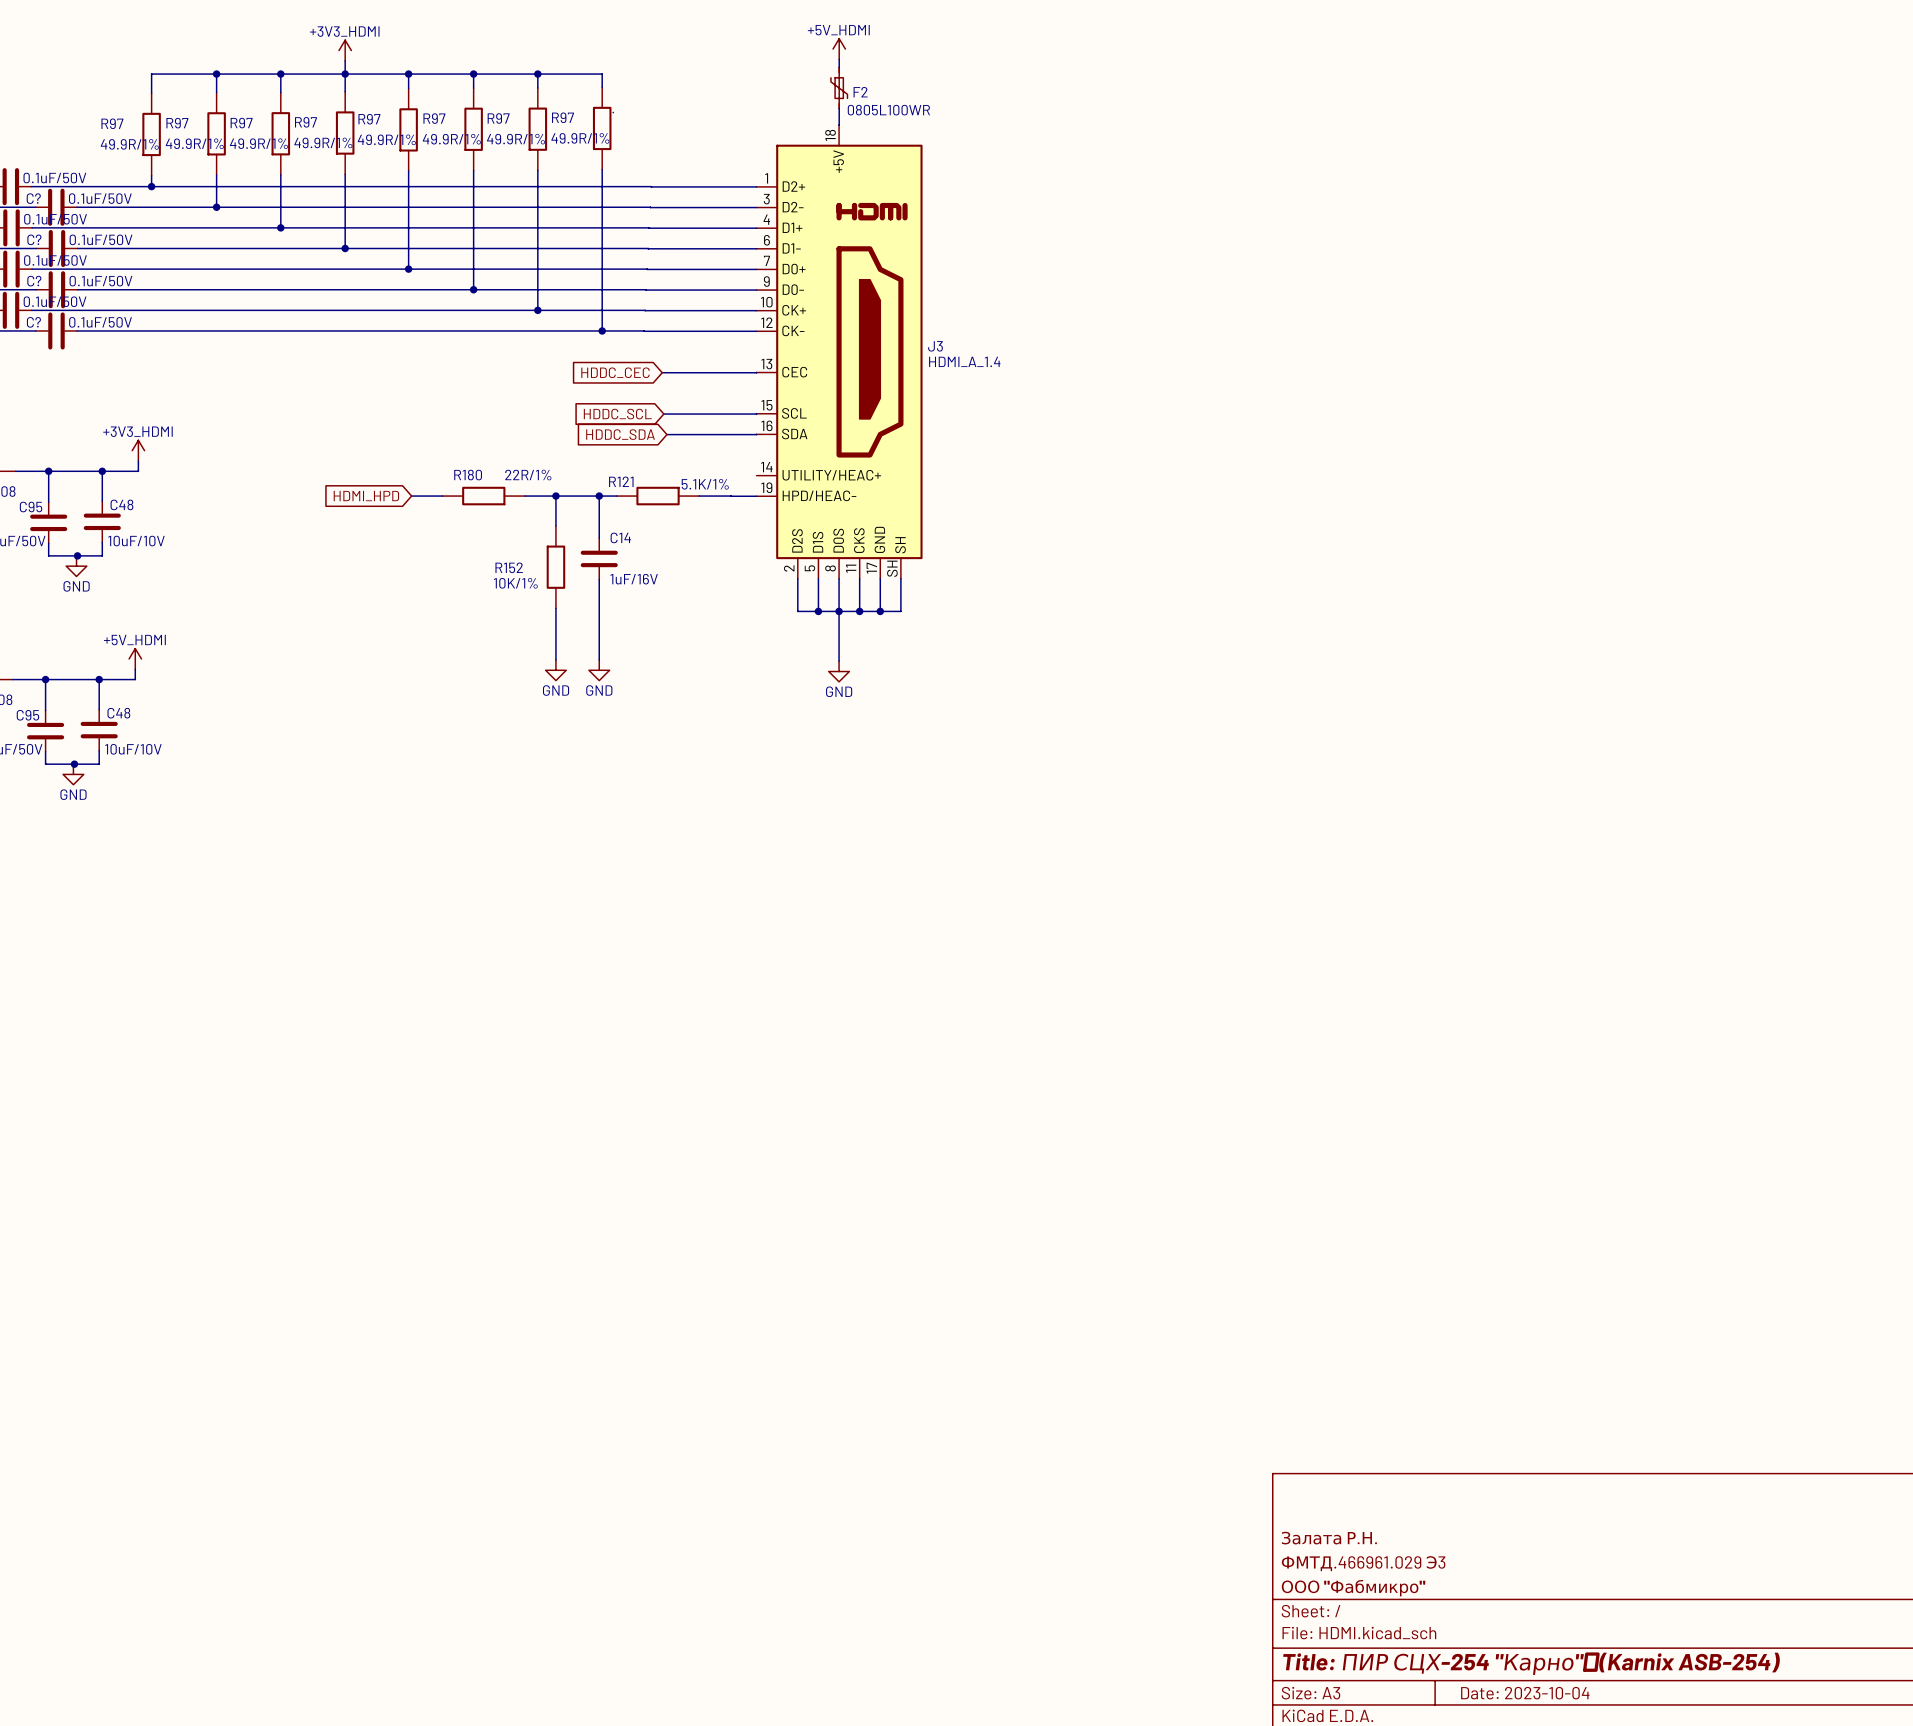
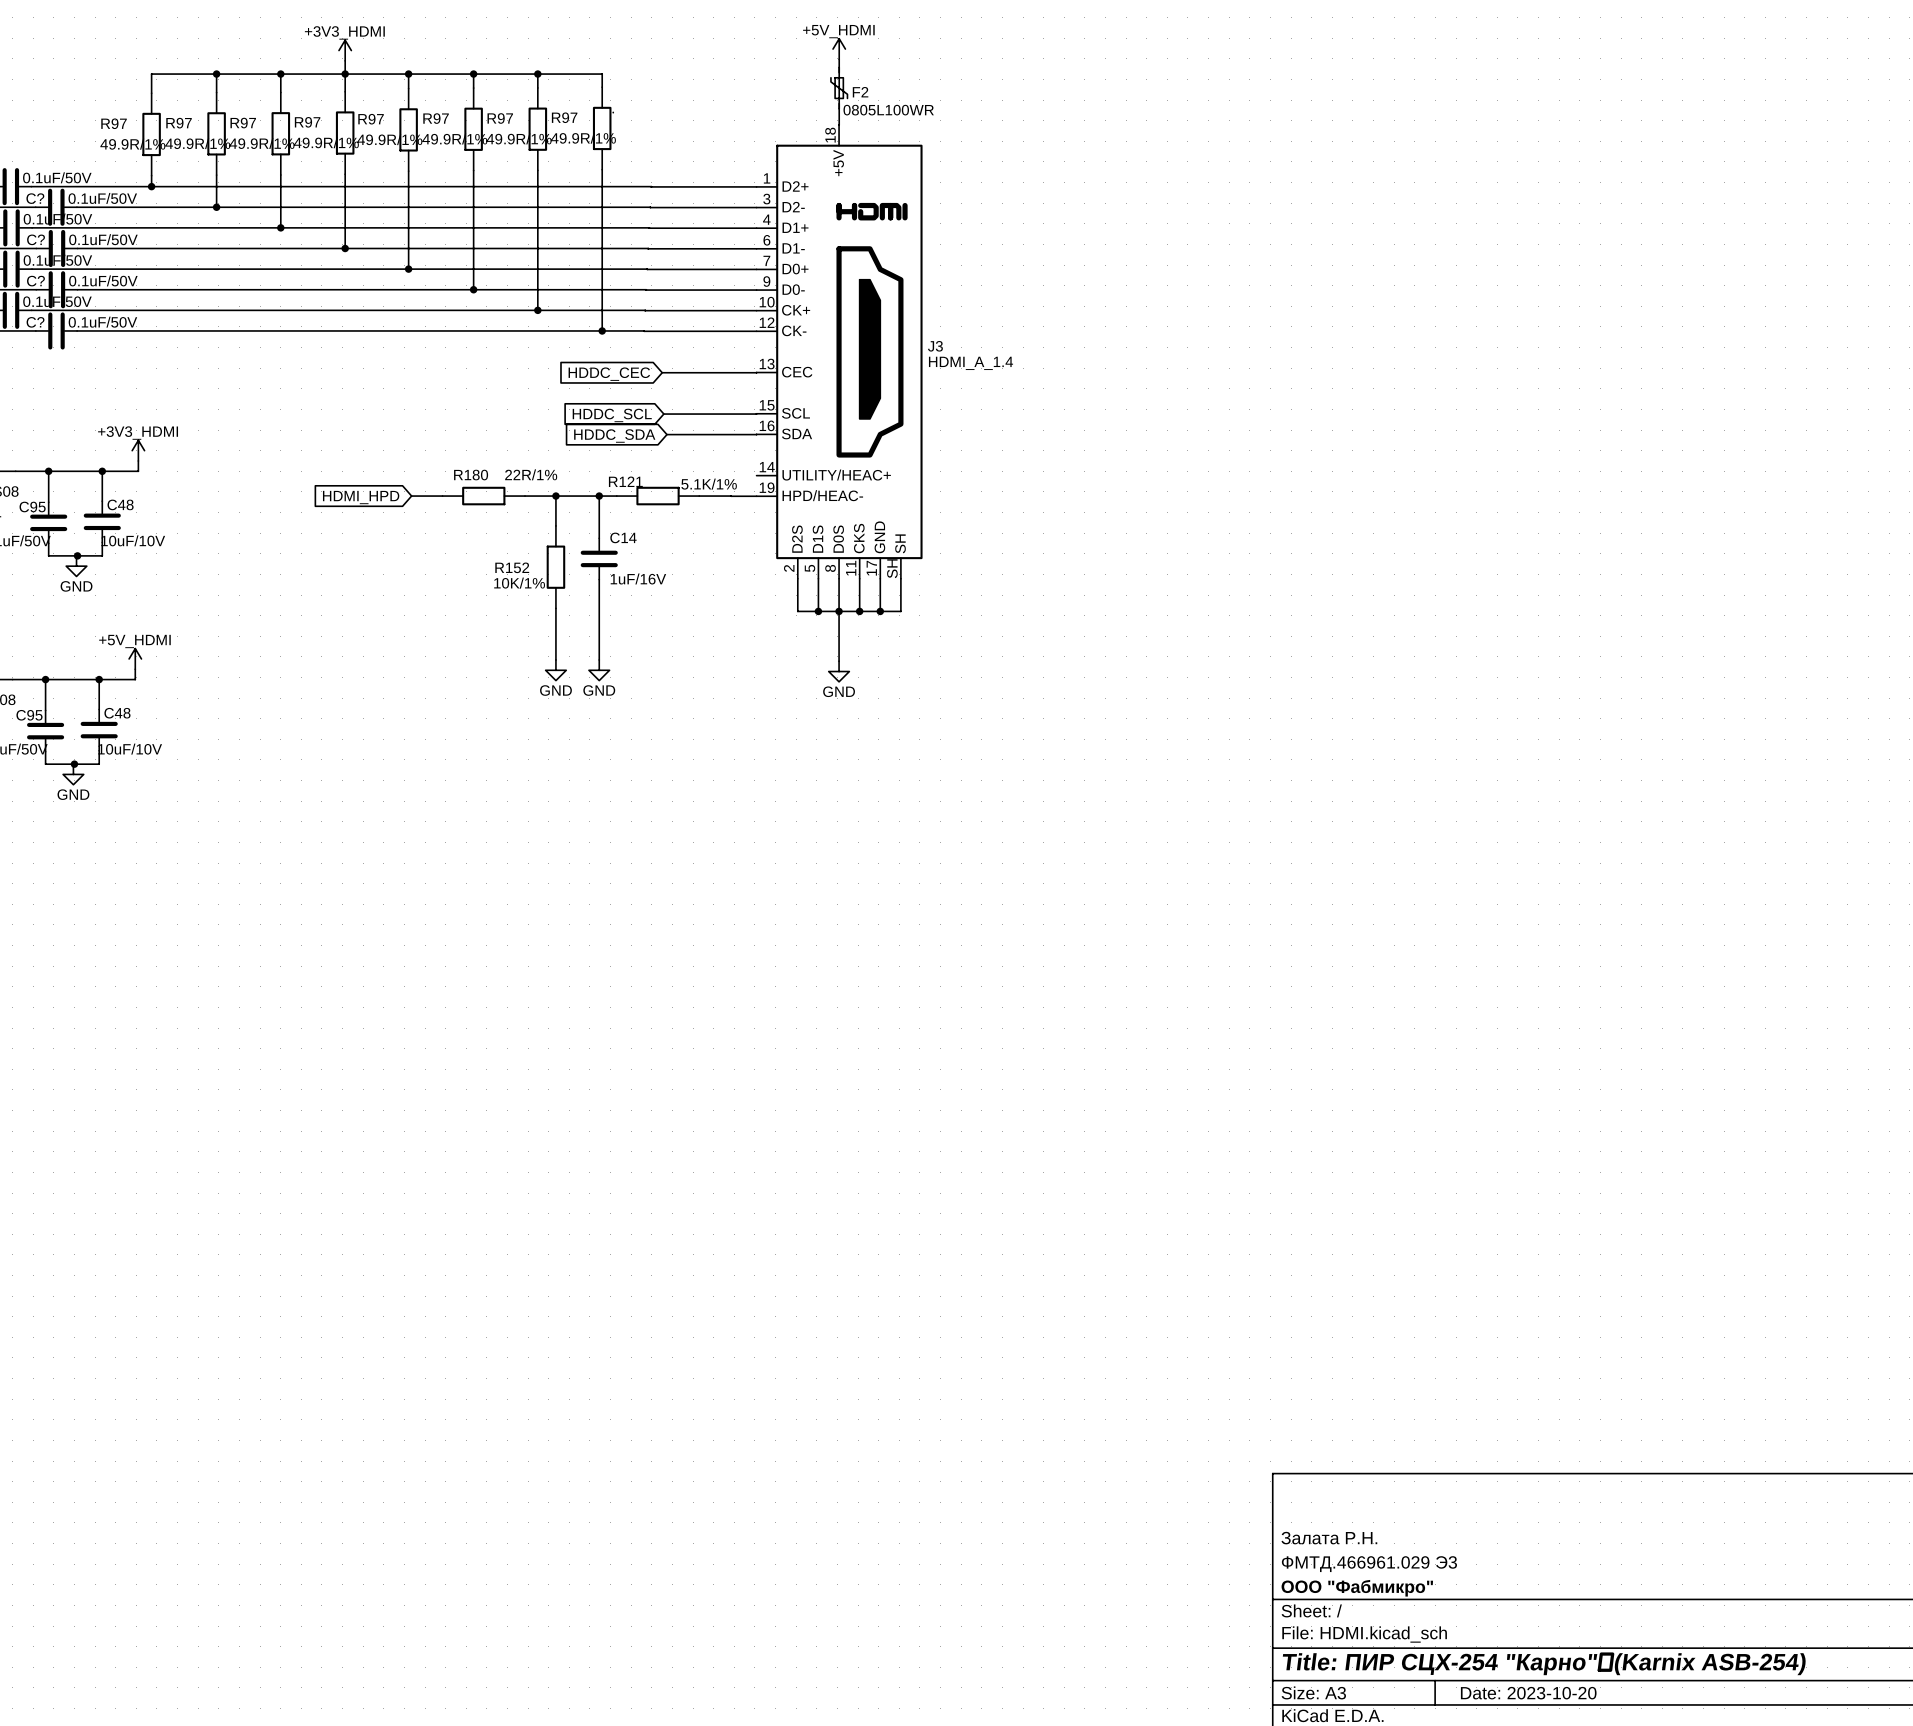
title block: Date: 2023-10-04 (1525, 1693) -> Date: 2023-10-20 (1528, 1693)

